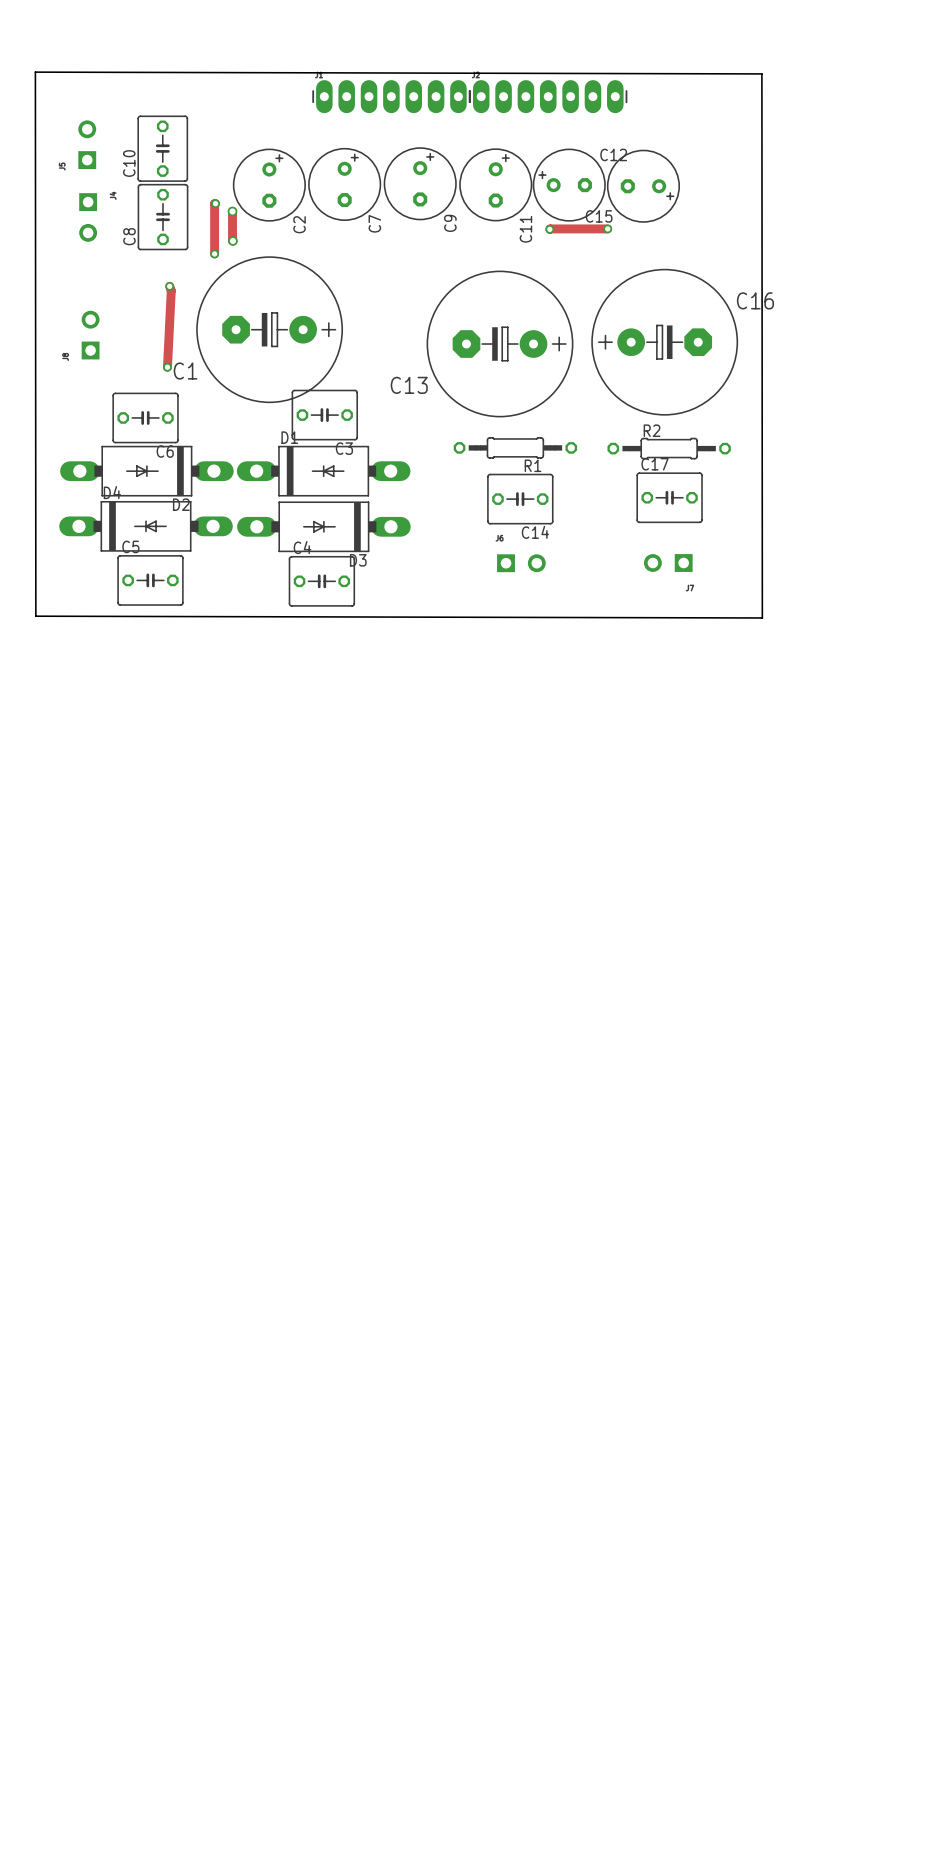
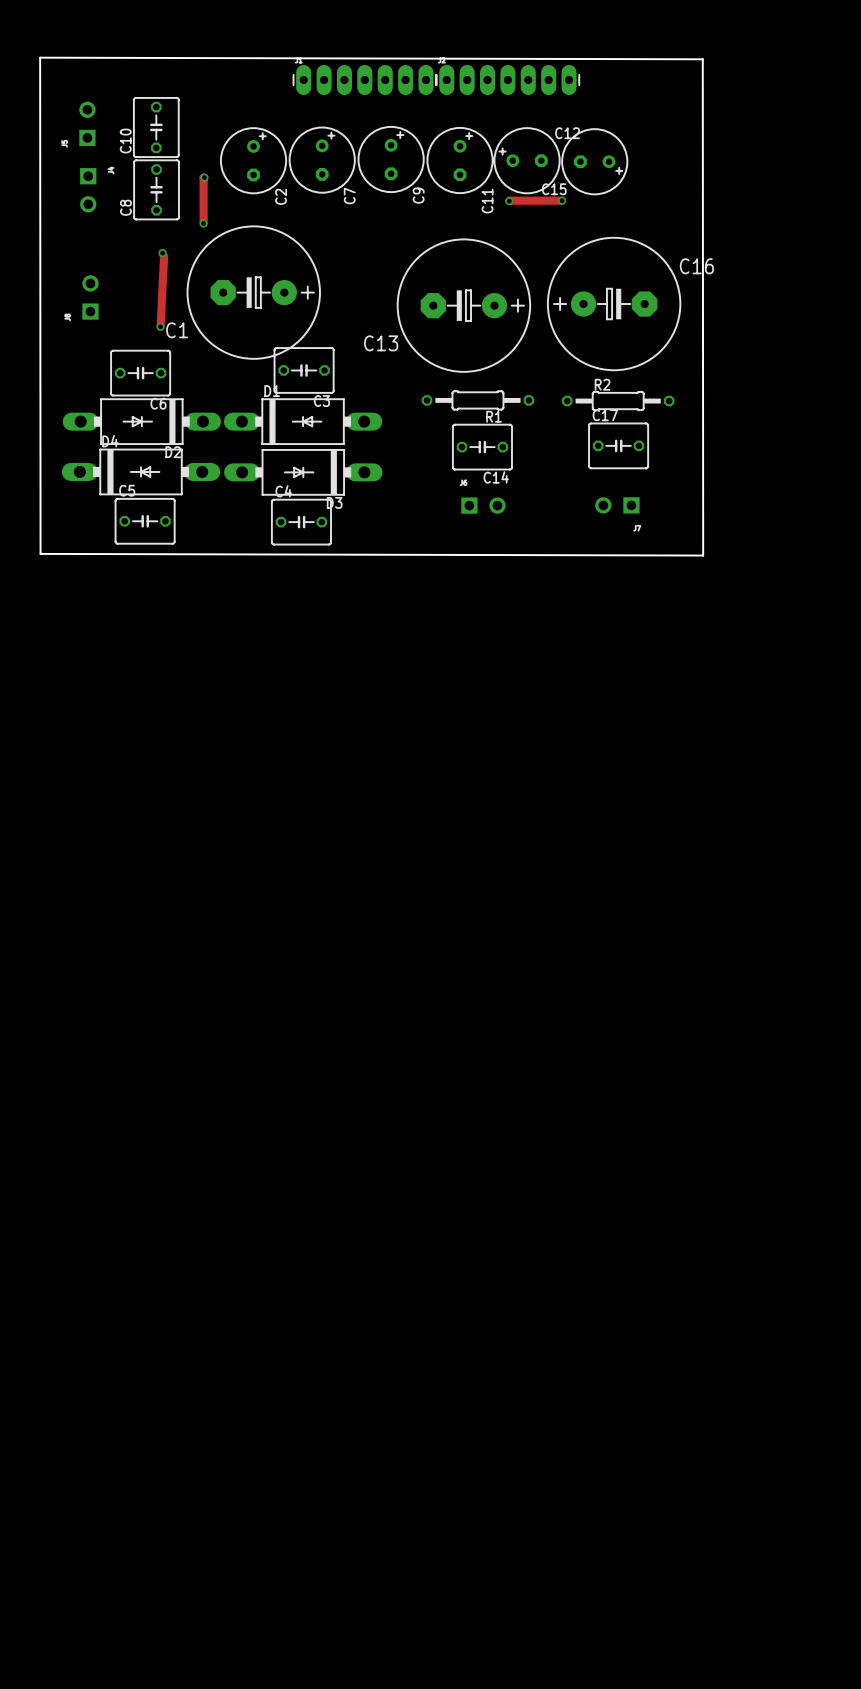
track: (232, 211) (232, 240) -> none
via: (232, 211) -> none
via: (232, 240) -> none

